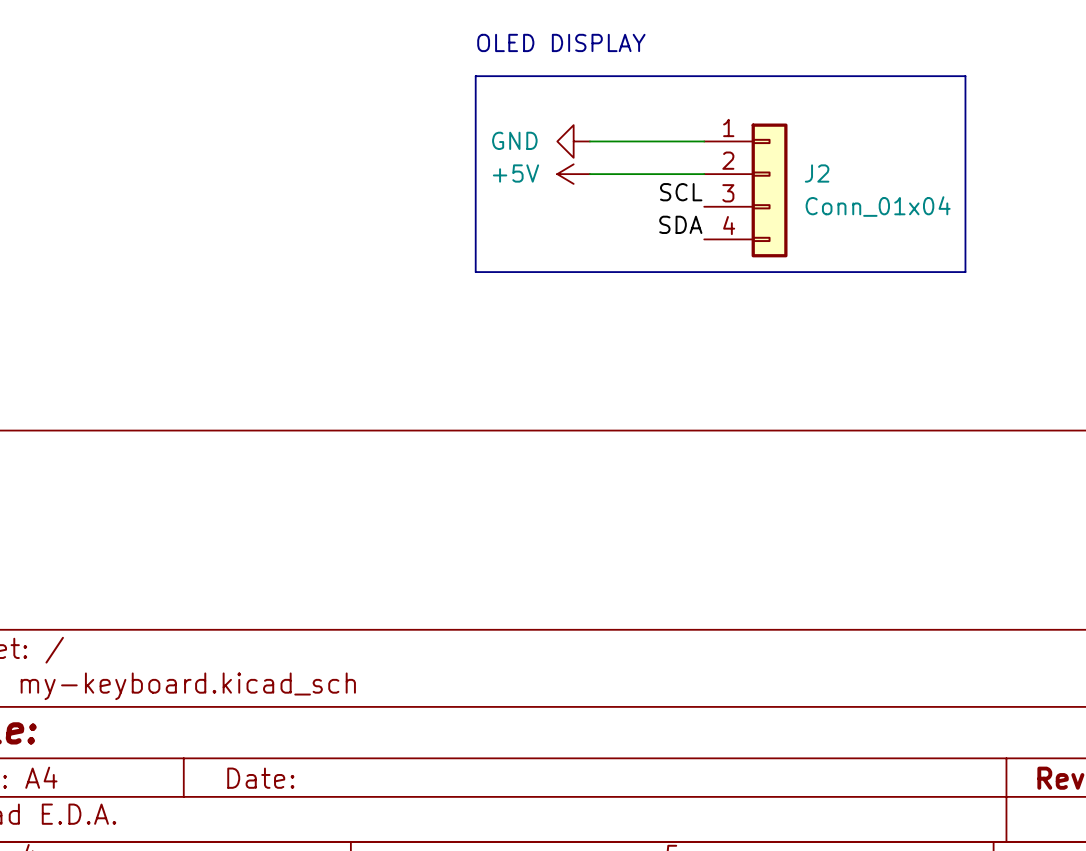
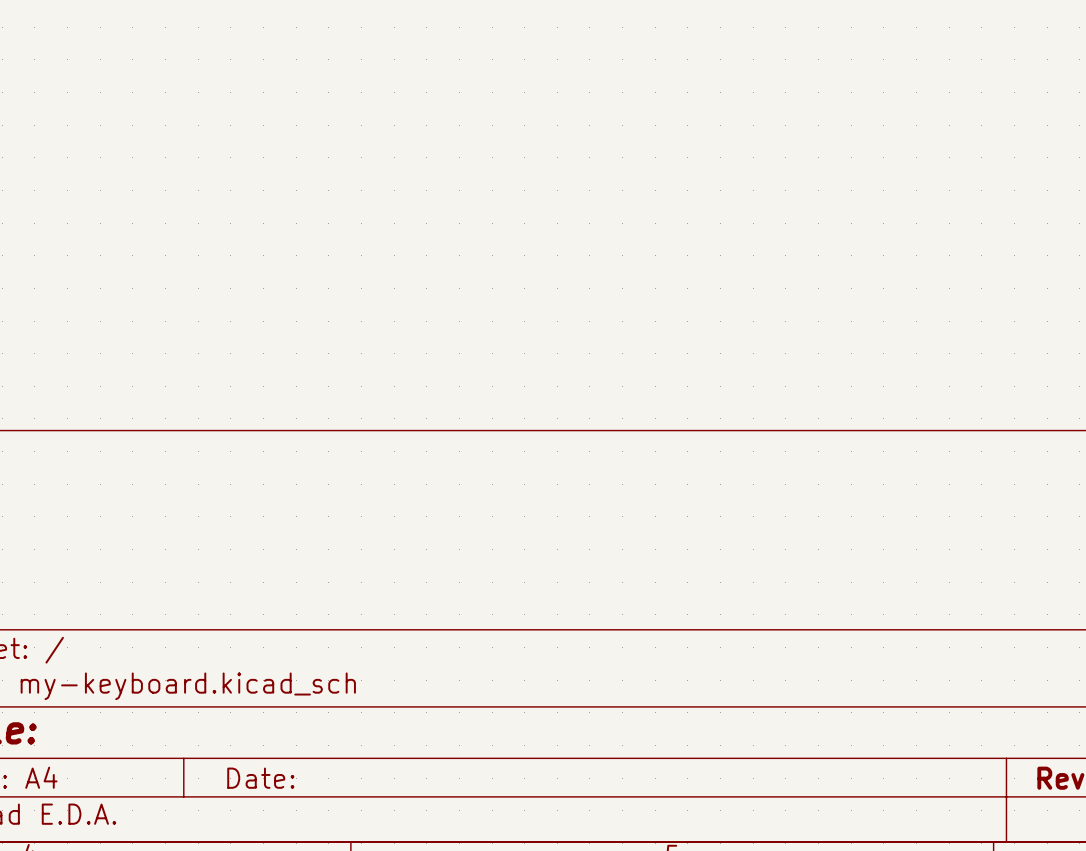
text: OLED DISPLAY (561, 42) -> none
line: (475, 76) (475, 272) (965, 272) (965, 76) (475, 76) -> none
power symbol: GND (573, 141) -> none
wire: (589, 141) (704, 141) -> none
power symbol: +5V (573, 174) -> none
wire: (589, 174) (704, 174) -> none
J2: Conn_01x04 (745, 190) -> none
label: SCL (681, 192) -> none
label: SDA (680, 224) -> none

